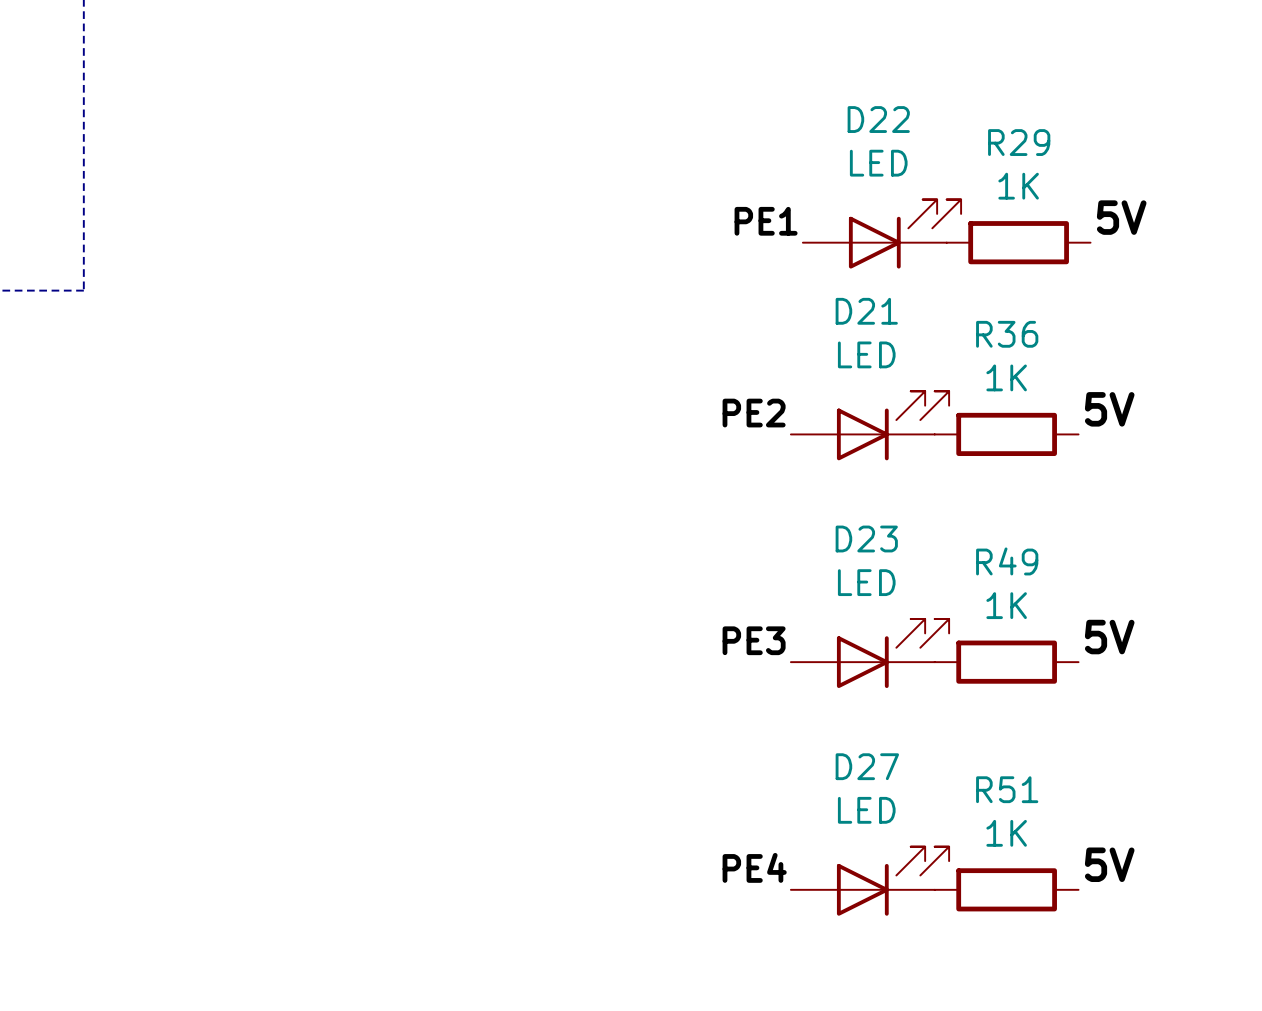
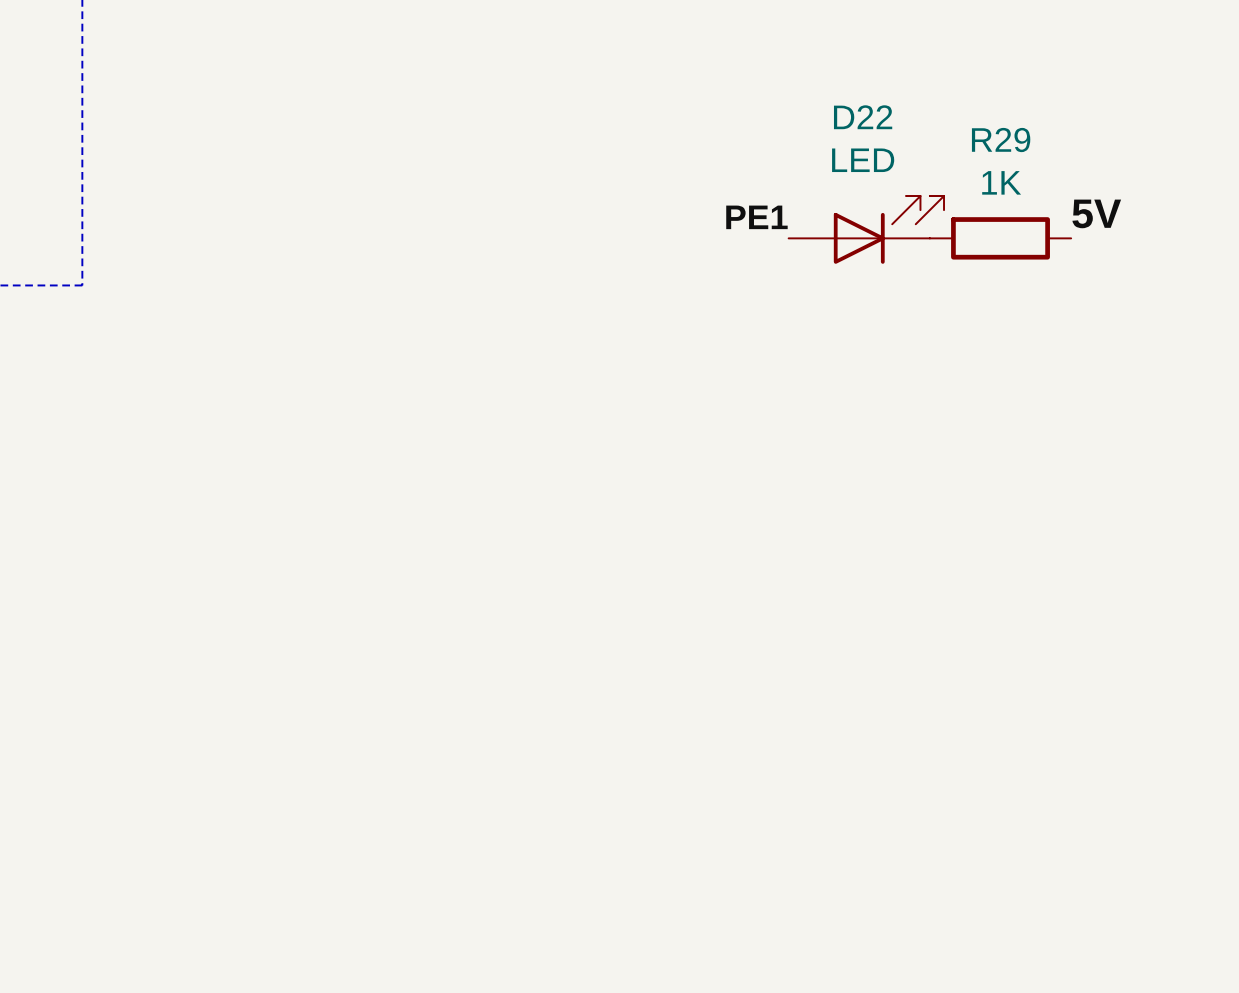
label: 5V (1109, 409) -> none
label: PE2 (754, 413) -> none
D21: LED (870, 425) -> none
R36: 1K (1006, 434) -> none
label: 5V (1109, 637) -> none
label: PE3 (754, 640) -> none
D23: LED (870, 653) -> none
R49: 1K (1006, 662) -> none
label: 5V (1109, 864) -> none
label: PE4 (754, 867) -> none
D27: LED (870, 881) -> none
R51: 1K (1006, 889) -> none

